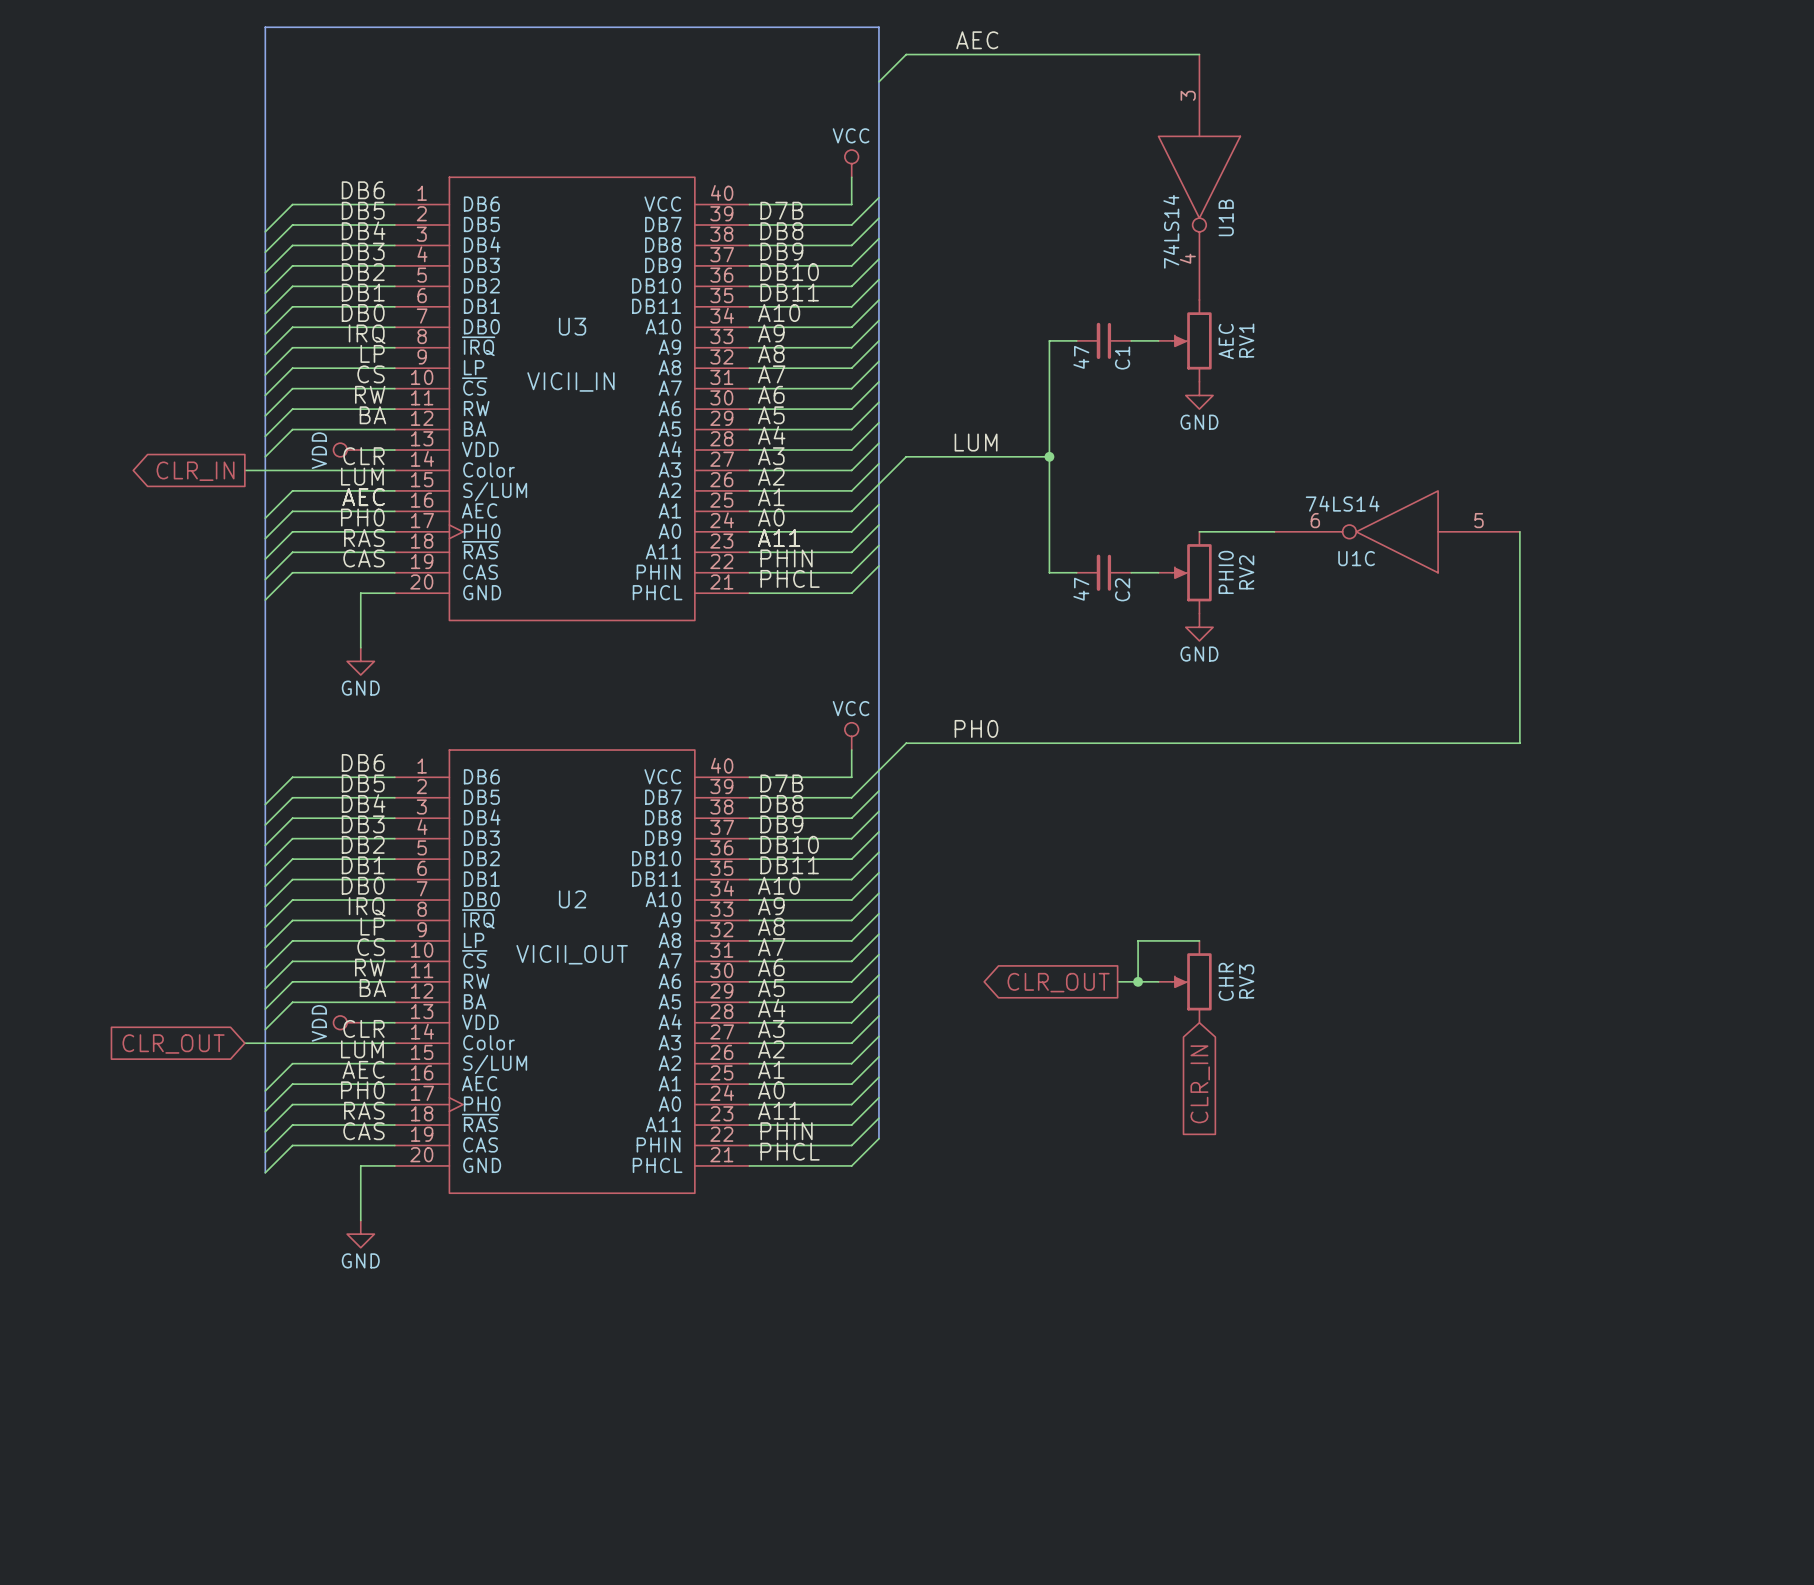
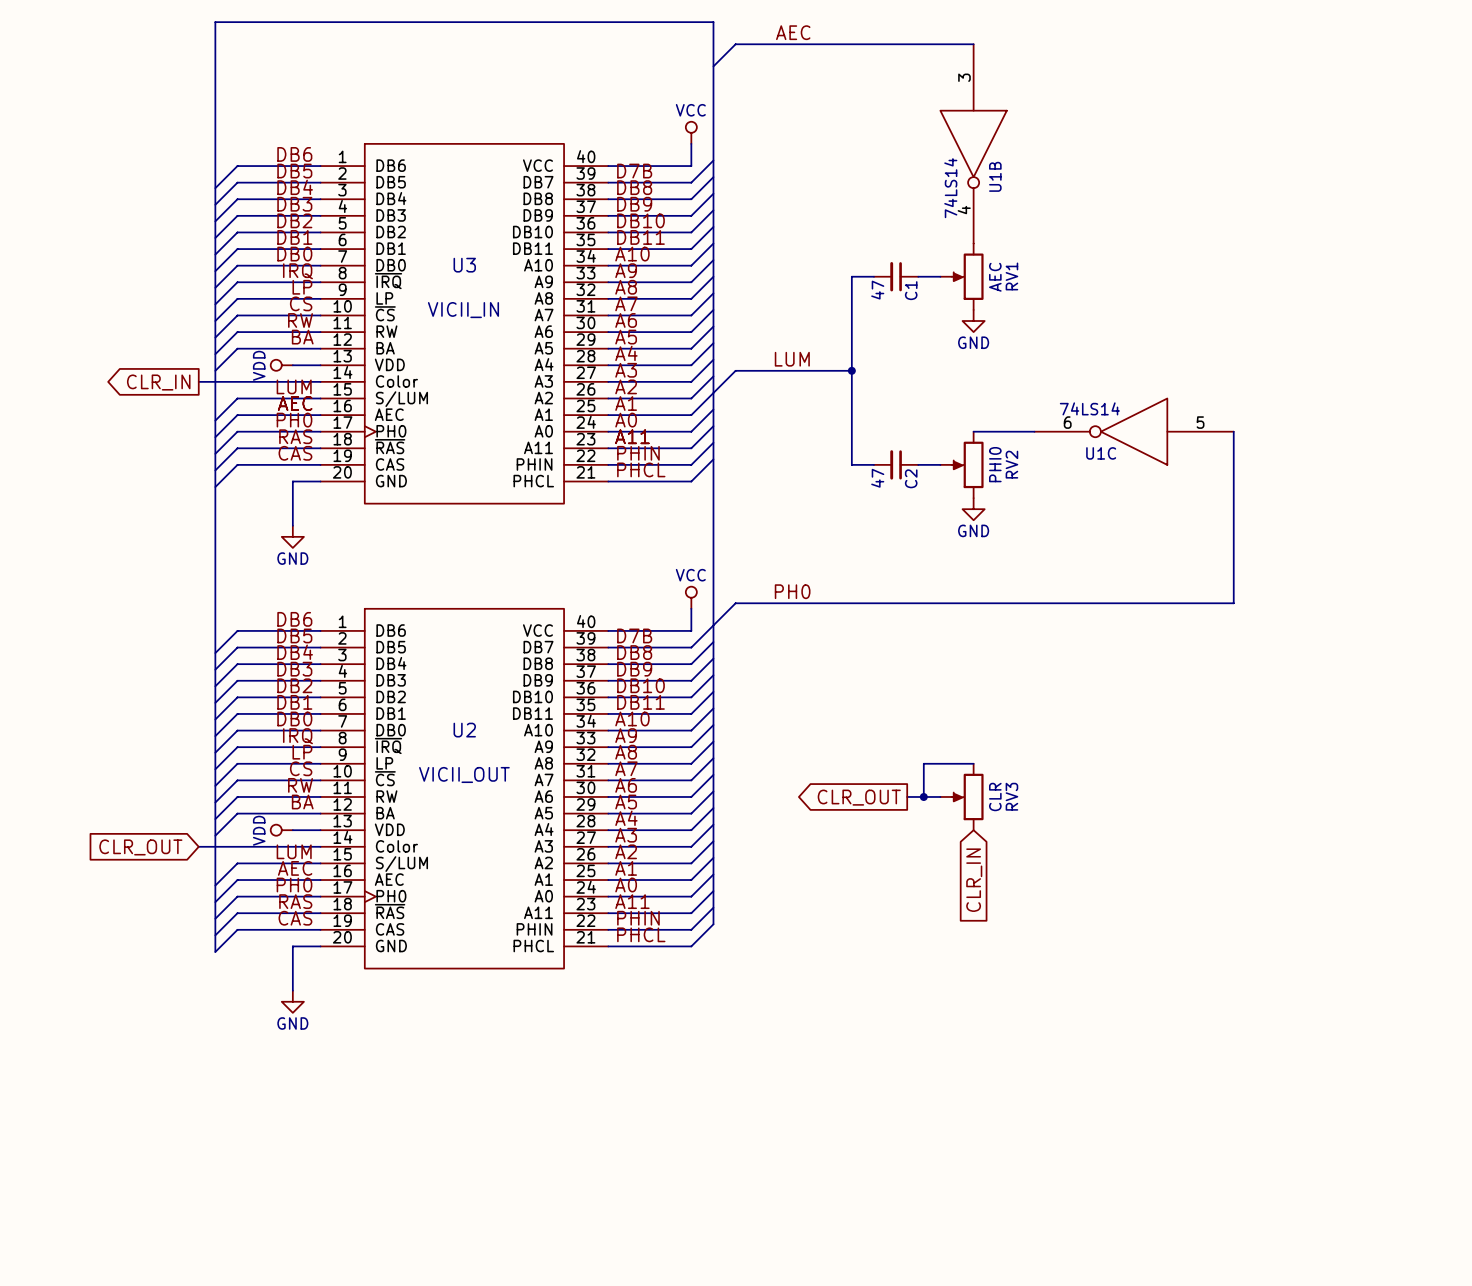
label: CLR (363, 456) -> none
RV3 value: CHR (1226, 981) -> CLR (995, 796)
label: CLR (363, 1028) -> none

